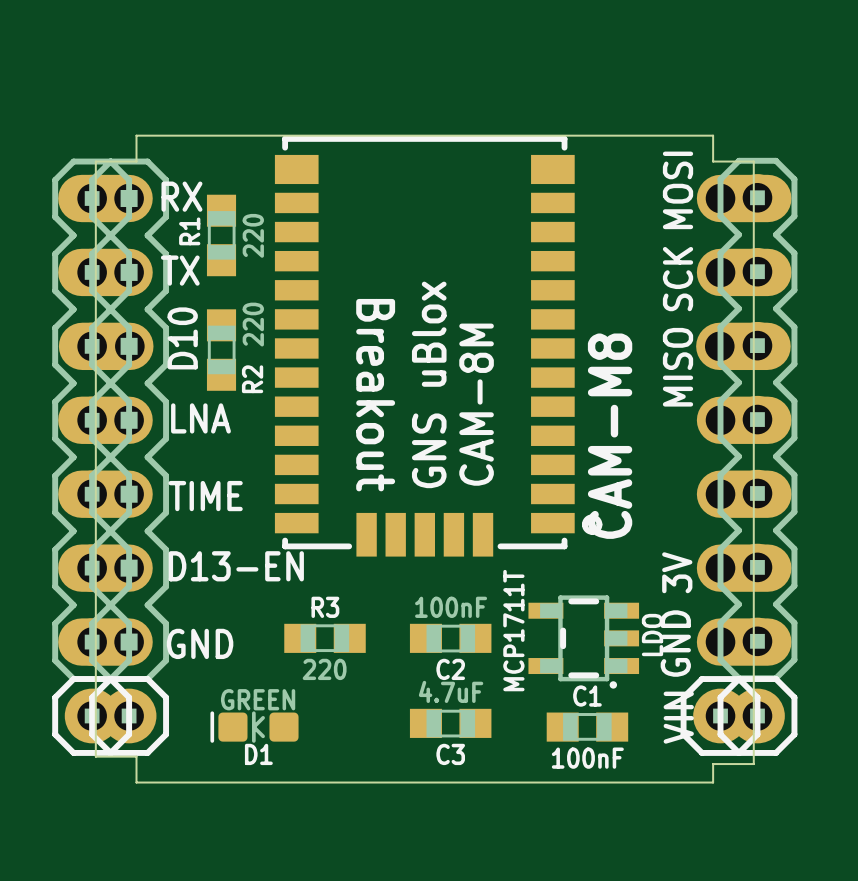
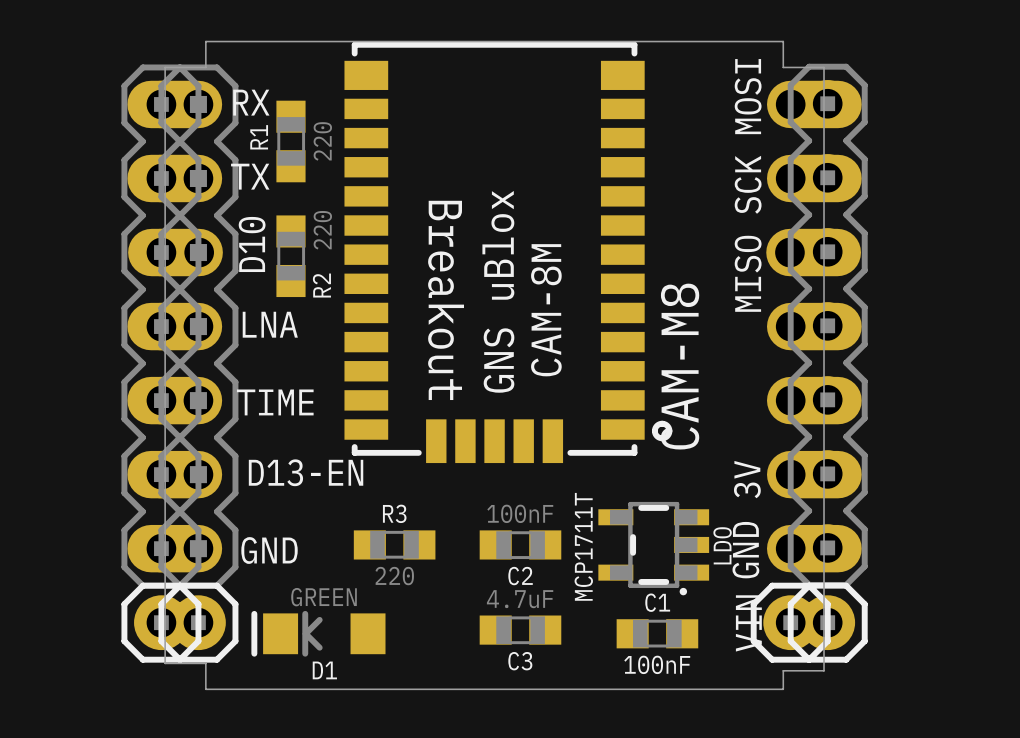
D1 footprint: [210, 711, 299, 743] -> [251, 610, 386, 657]

